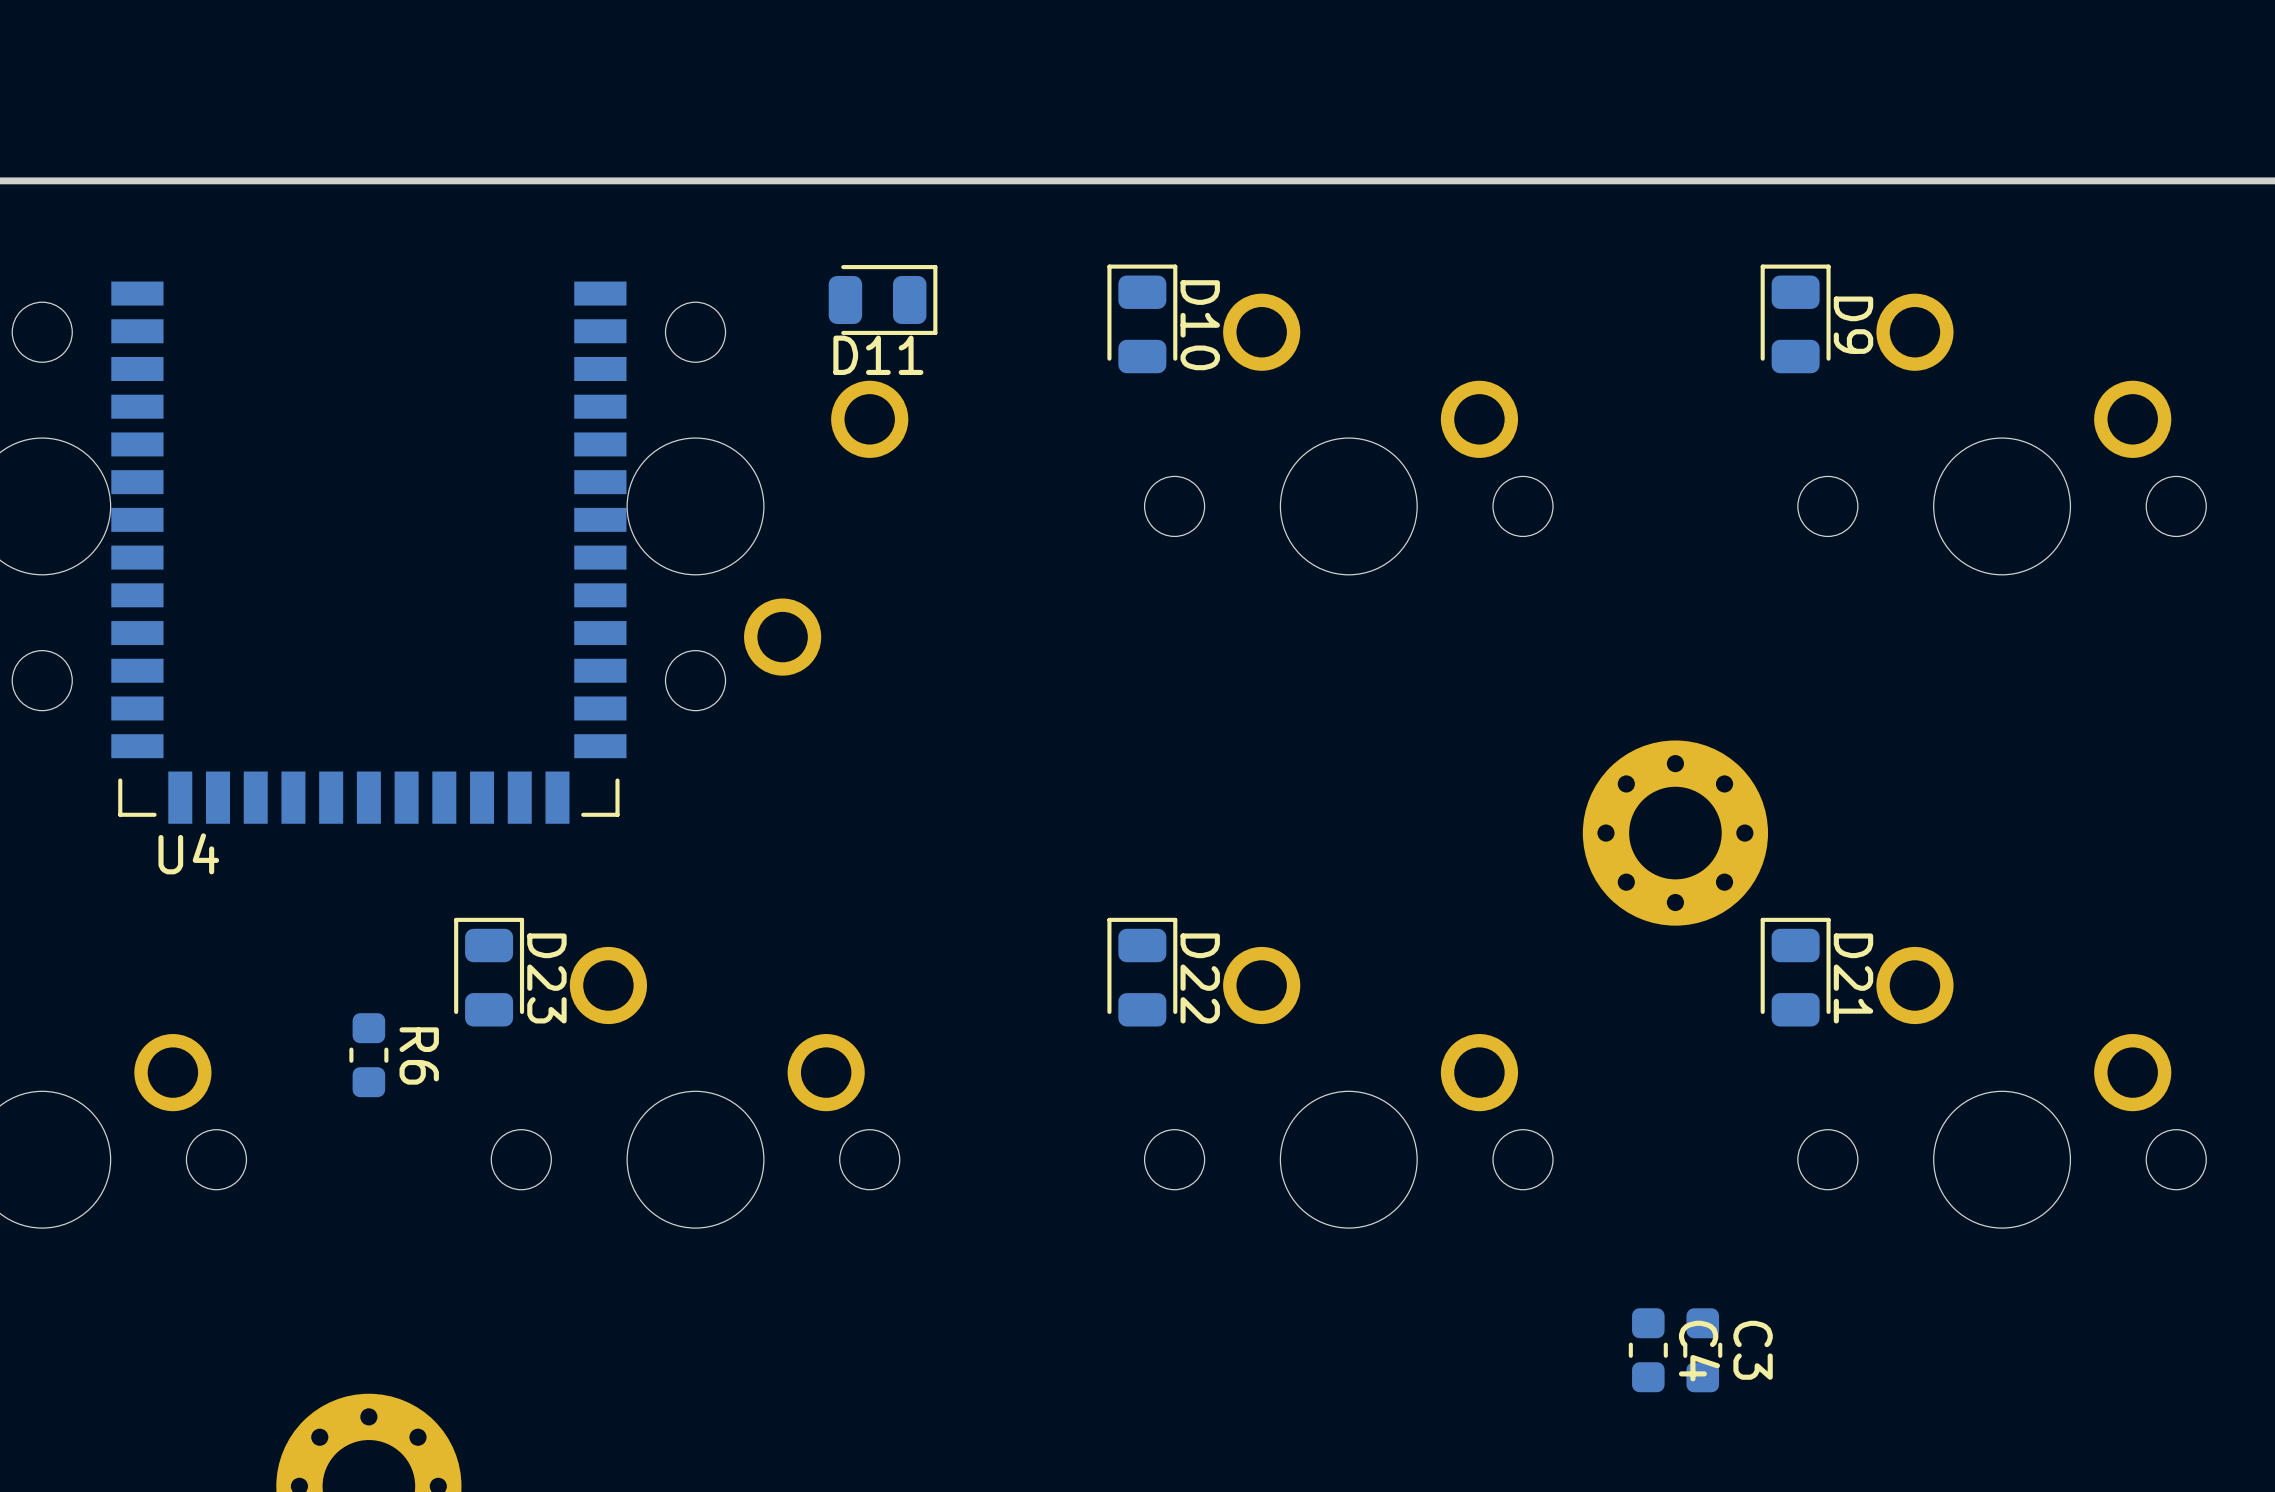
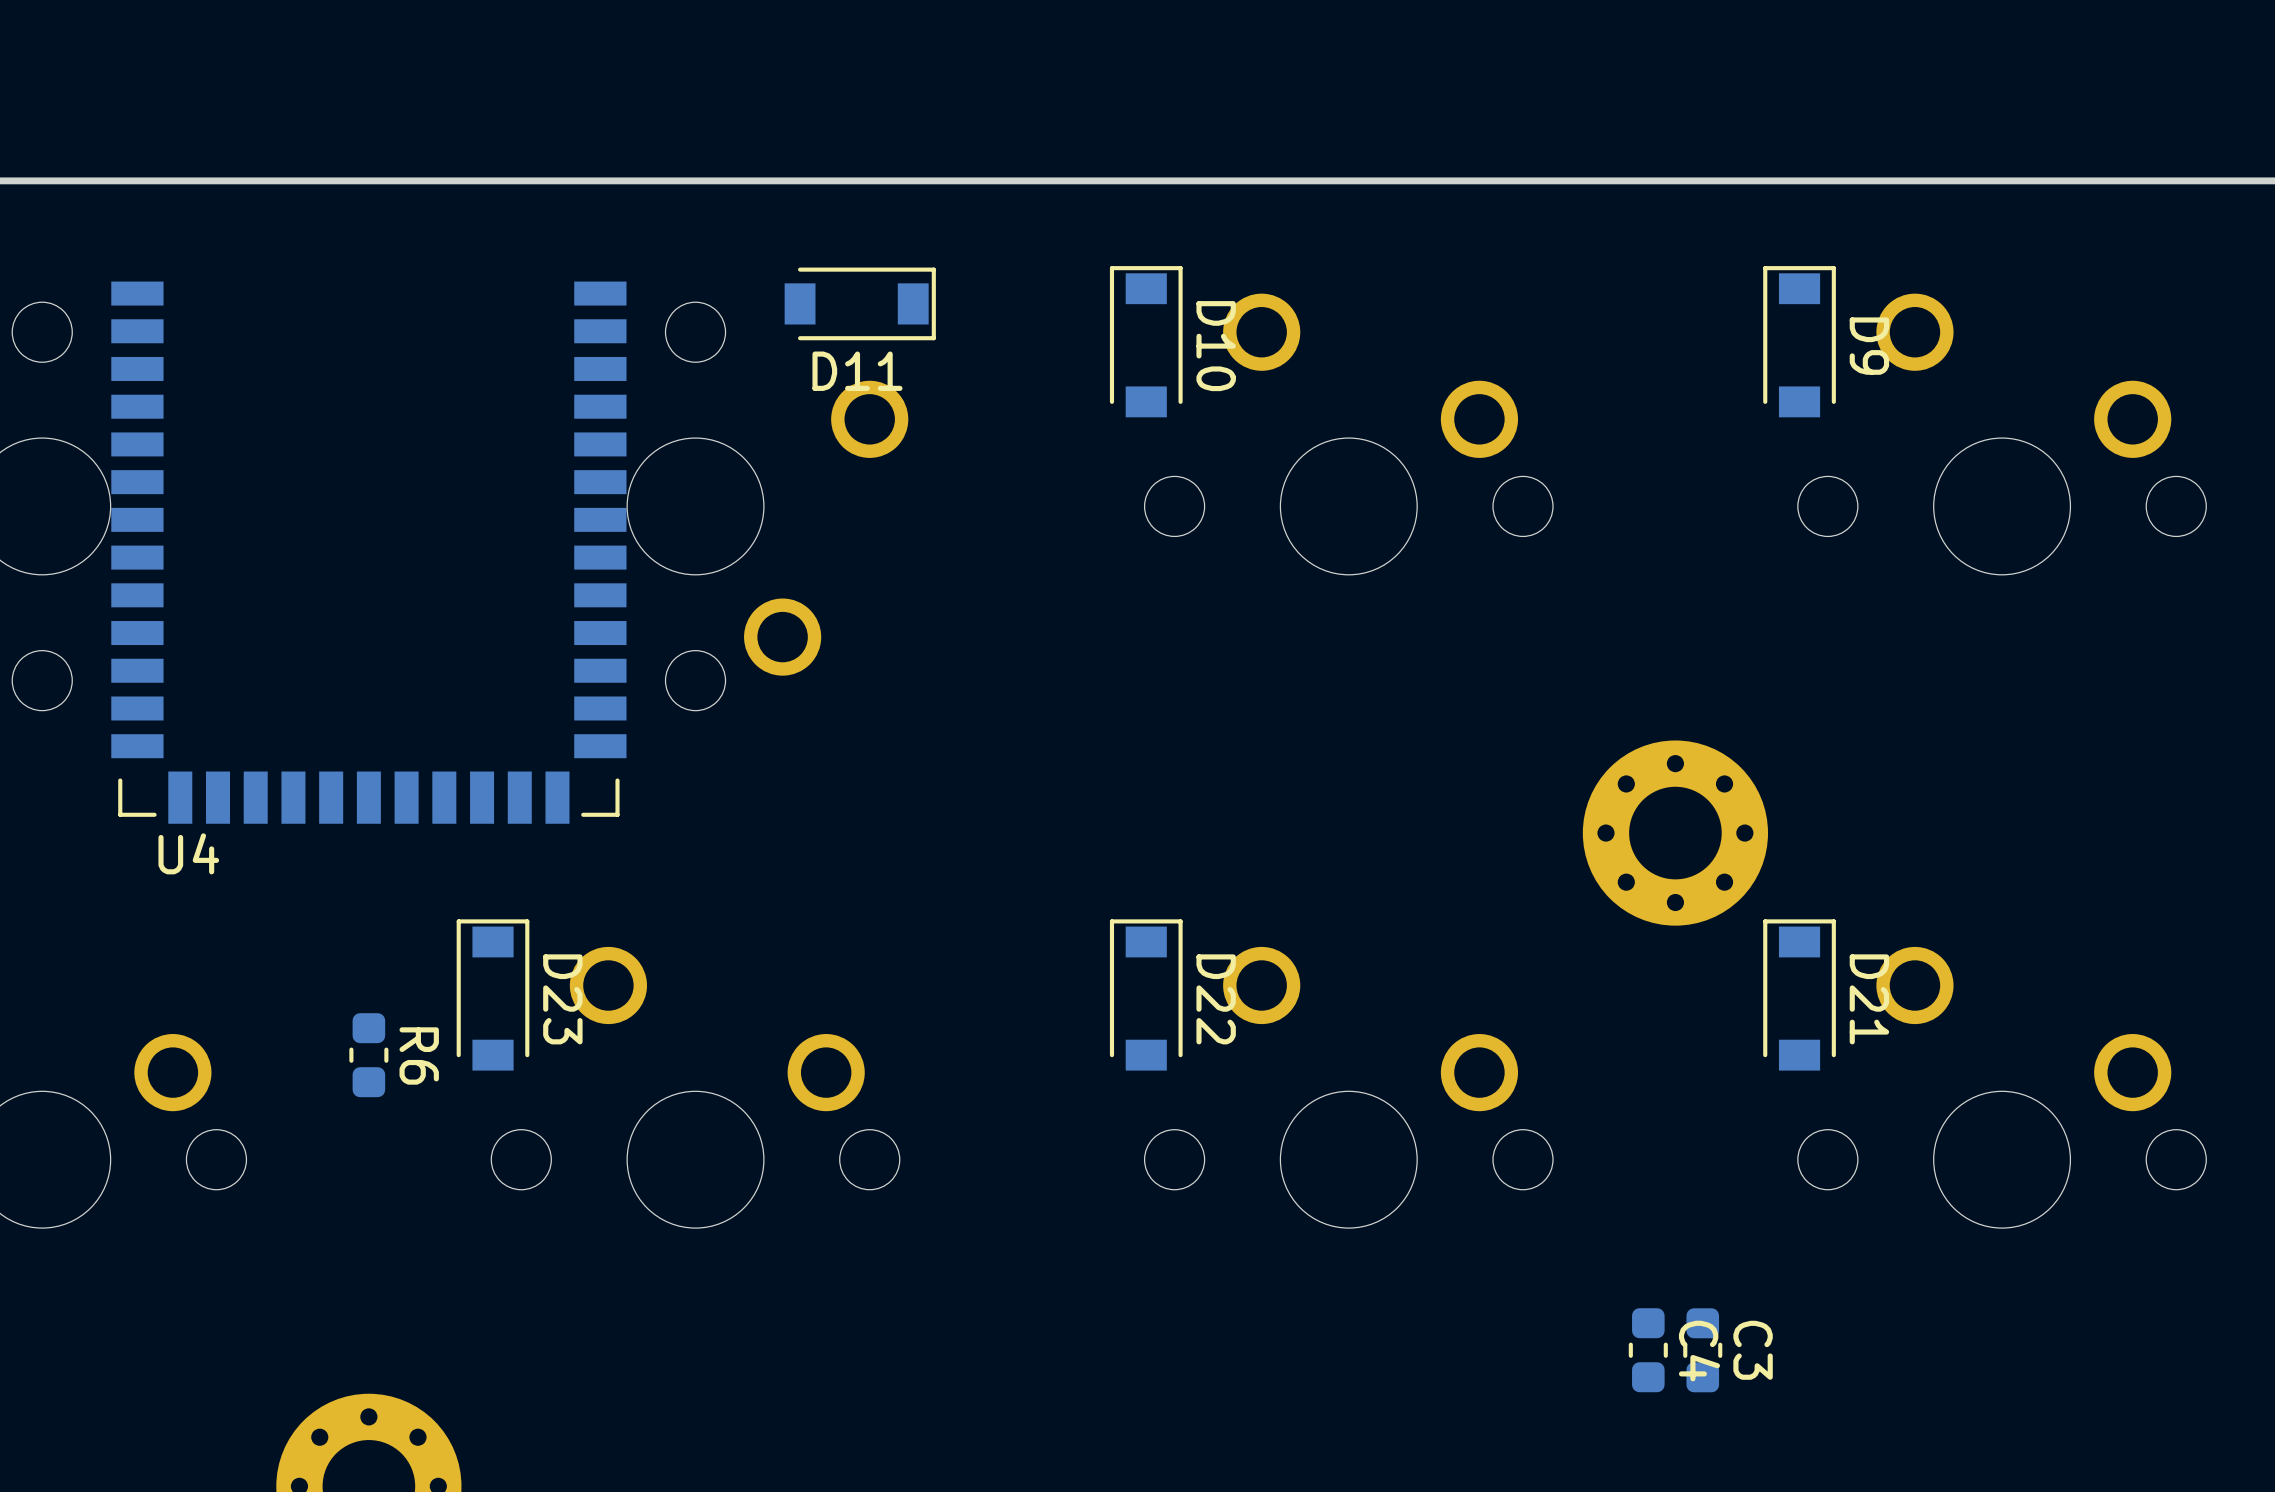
D10 footprint: [1107, 264, 1178, 374] -> [1109, 266, 1183, 418]
D9 footprint: [1760, 264, 1831, 374] -> [1763, 266, 1836, 418]
D11 footprint: [828, 265, 938, 335] -> [784, 267, 936, 341]
D23 footprint: [454, 917, 525, 1027] -> [456, 919, 530, 1071]
D22 footprint: [1107, 917, 1178, 1027] -> [1109, 919, 1183, 1071]
D21 footprint: [1760, 917, 1831, 1027] -> [1763, 919, 1836, 1071]

